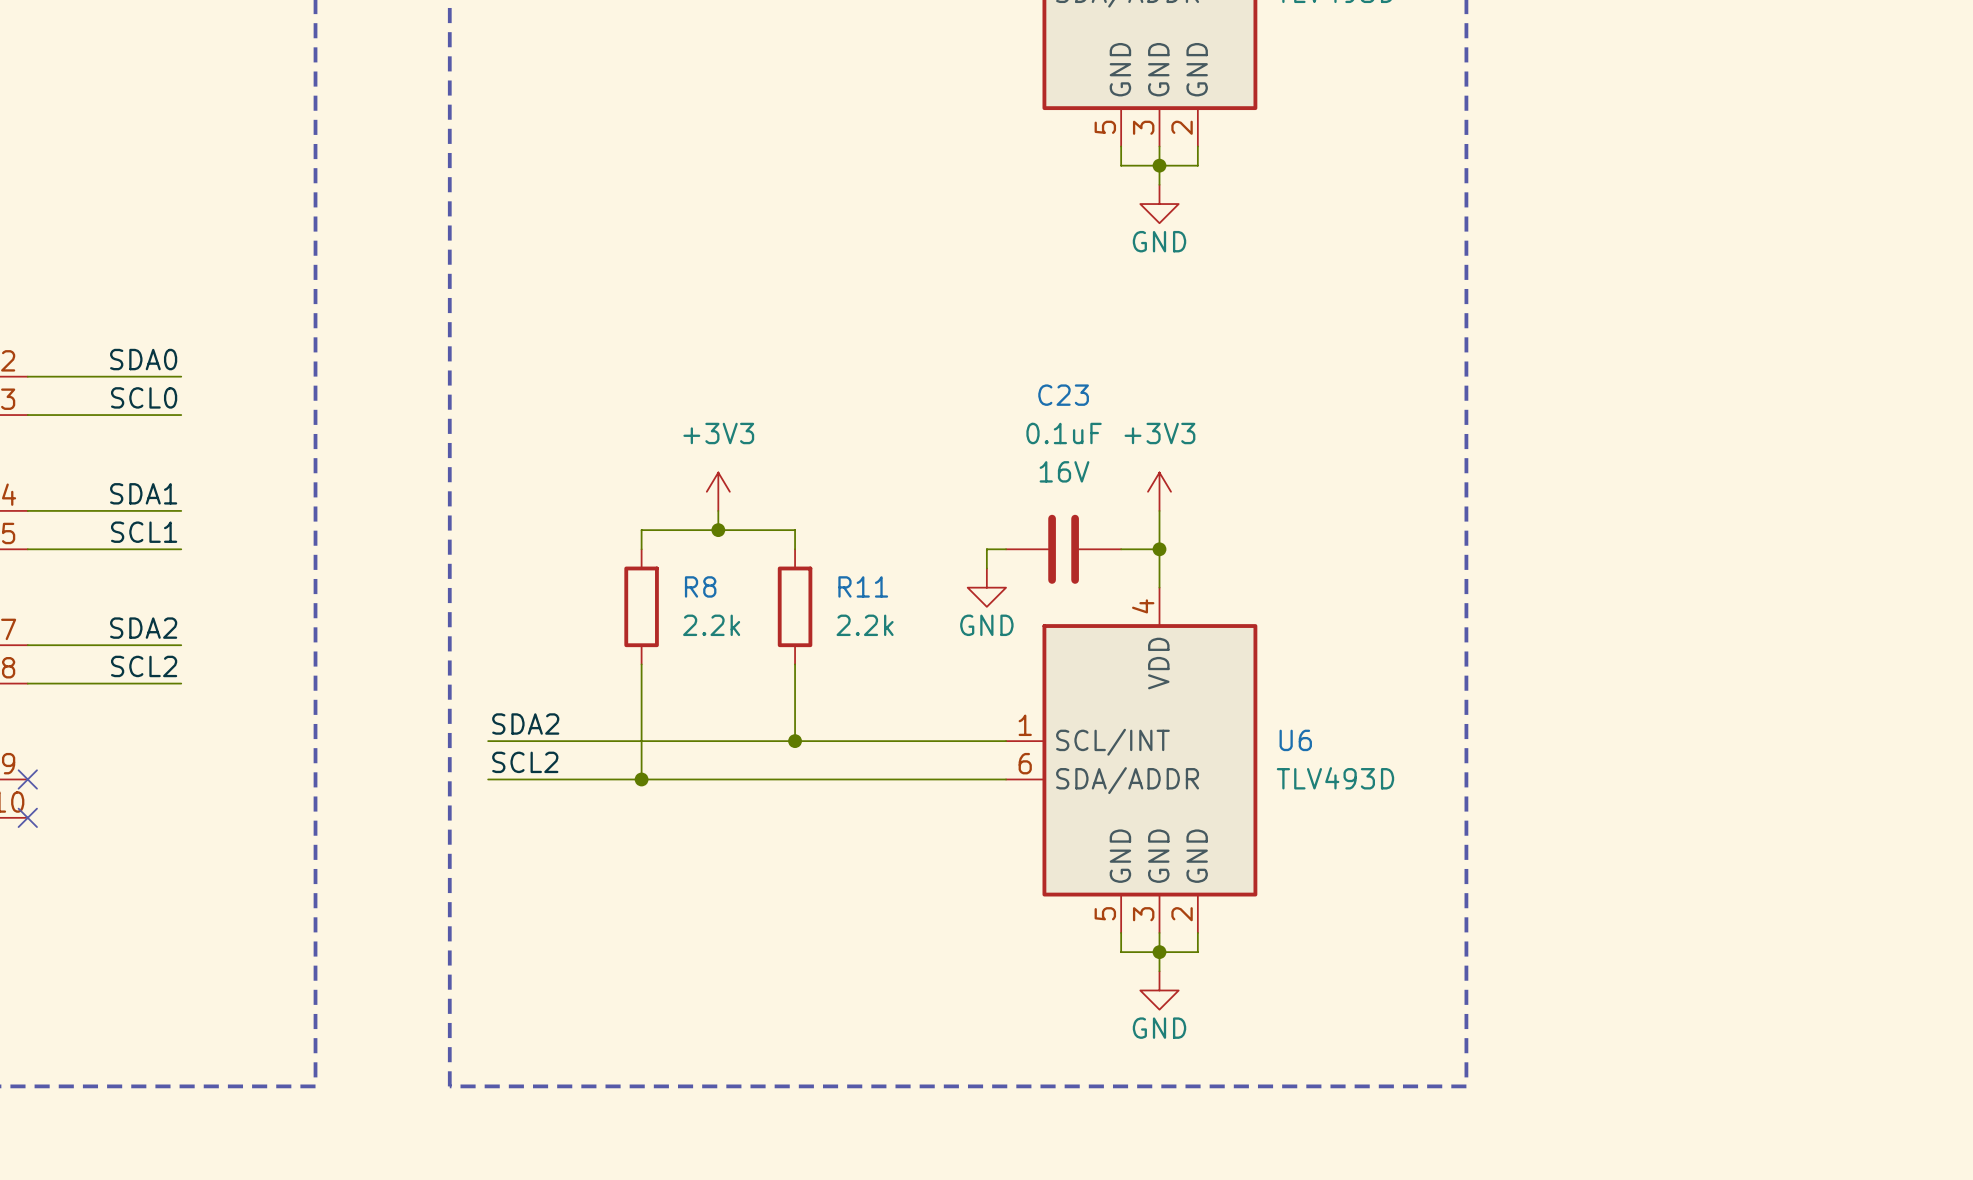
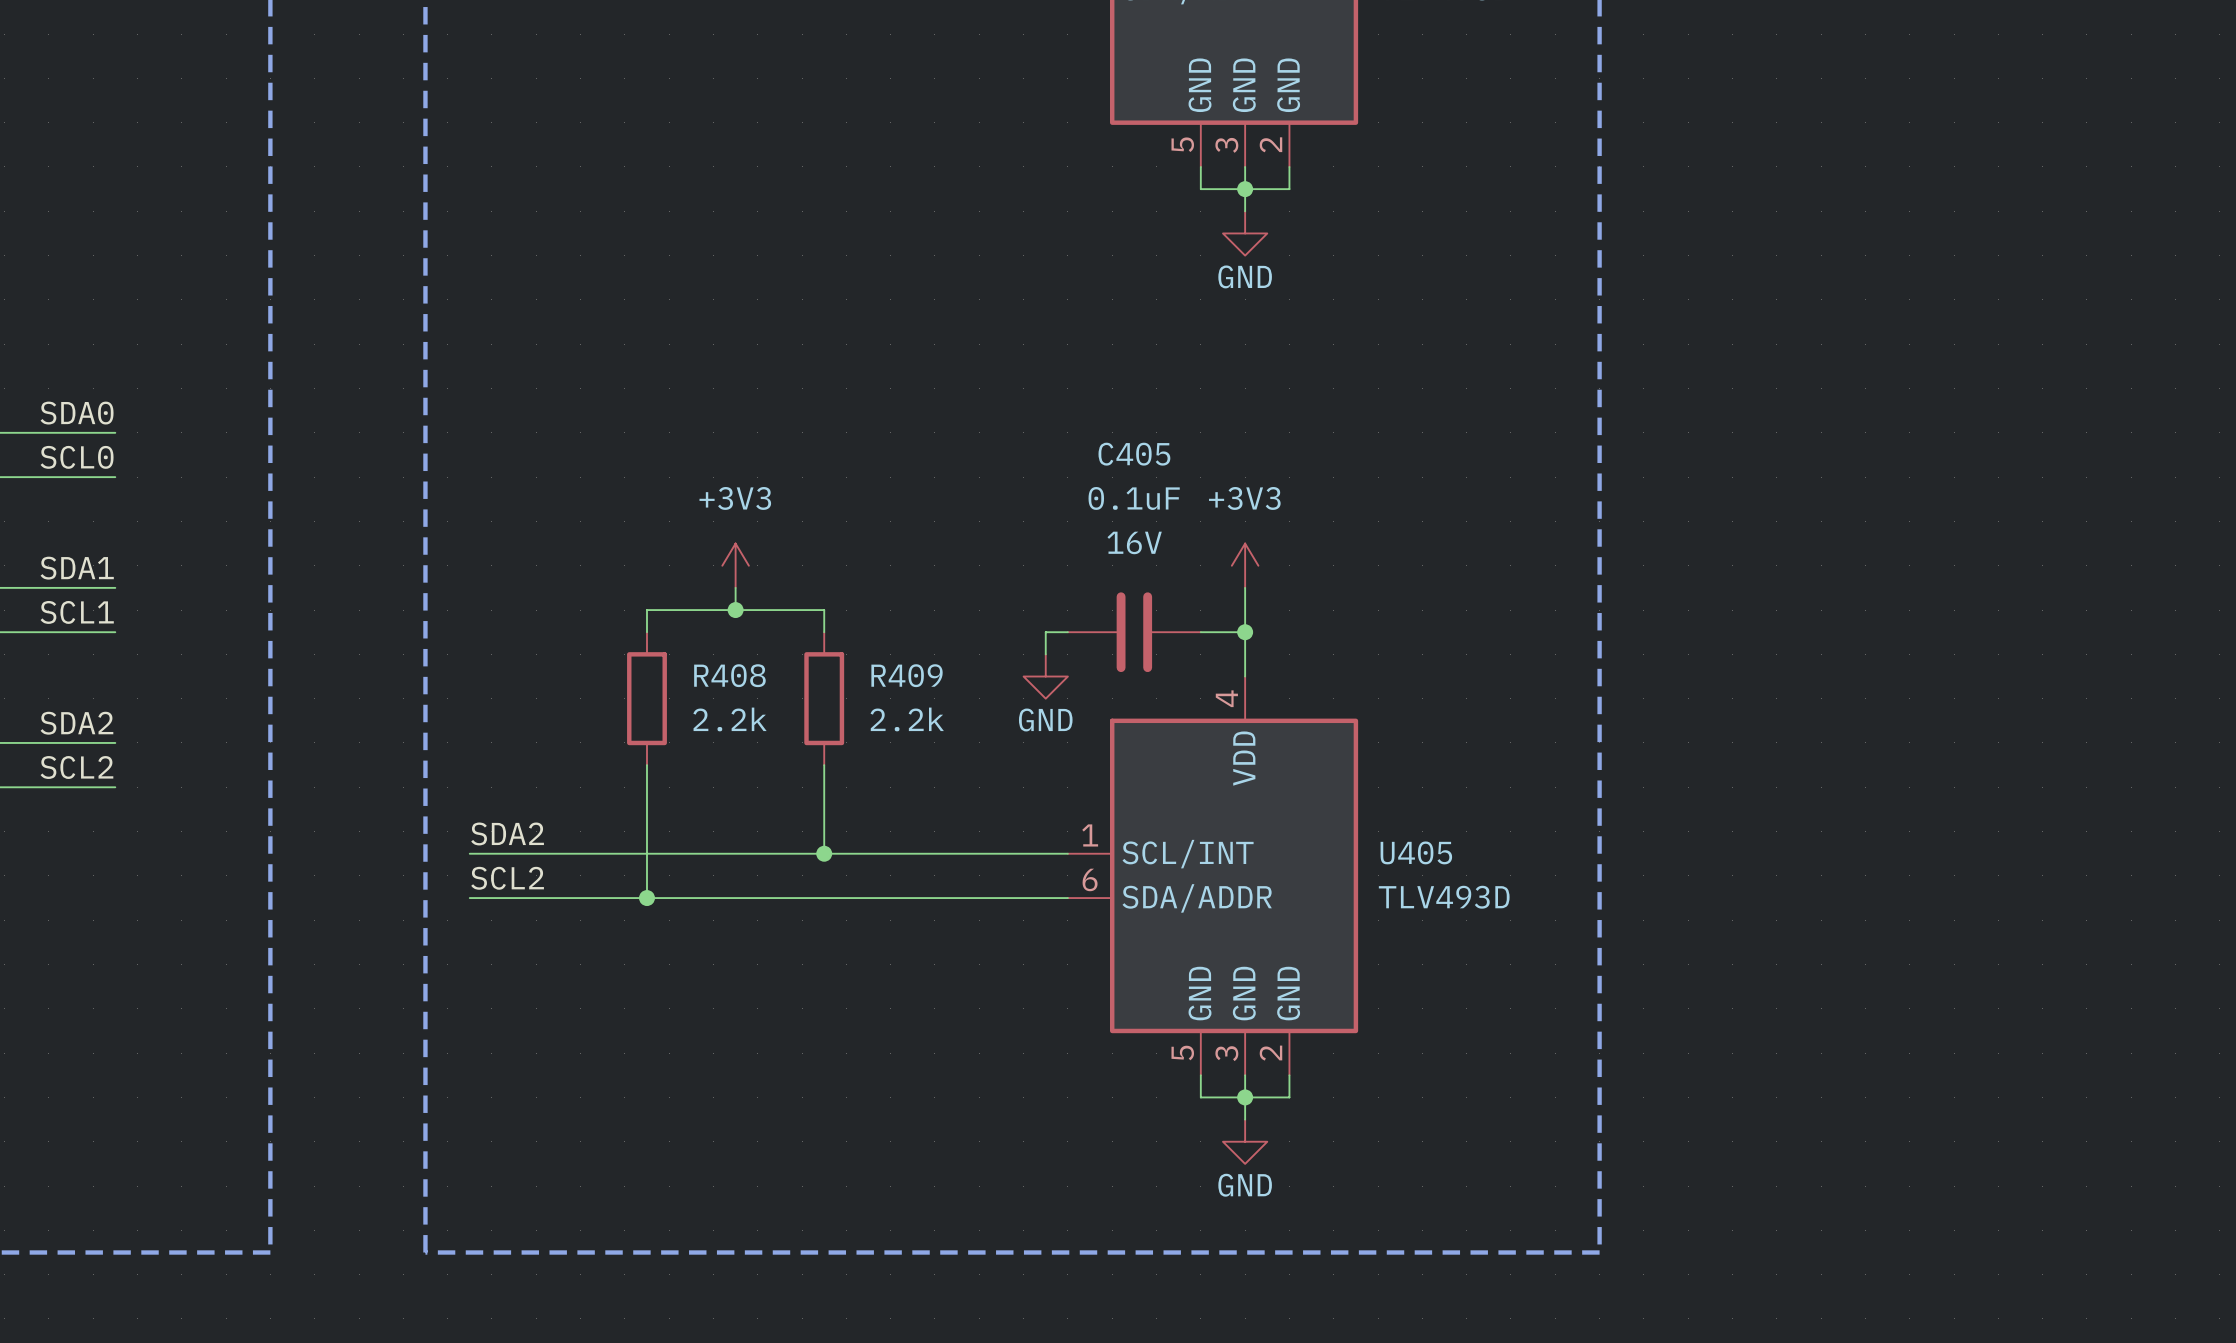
C23 name: C23 (1063, 395) -> C405 (1134, 454)
R8 name: R8 (700, 586) -> R408 (729, 675)
R11 name: R11 (863, 586) -> R409 (907, 675)
U6 name: U6 (1295, 740) -> U405 (1416, 852)

